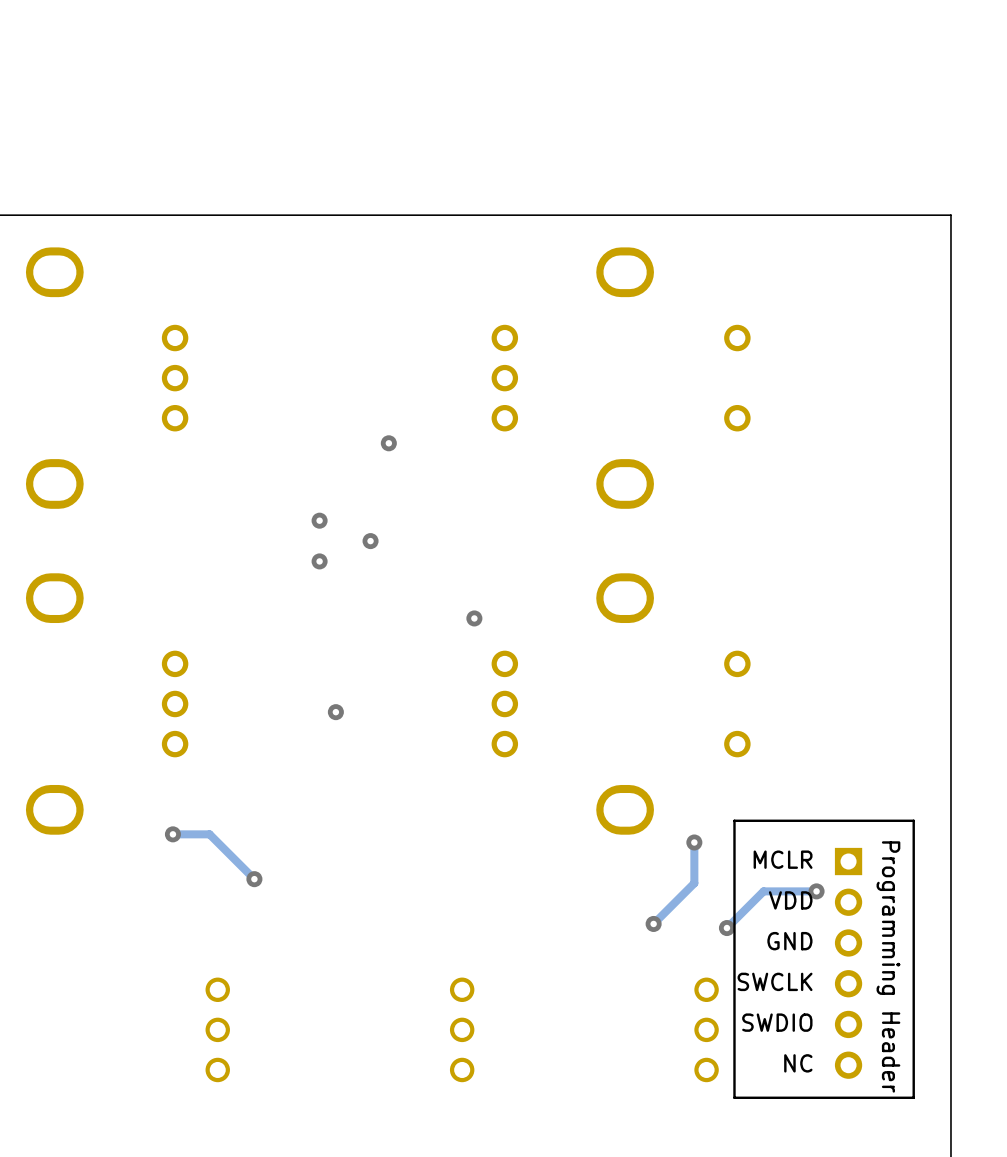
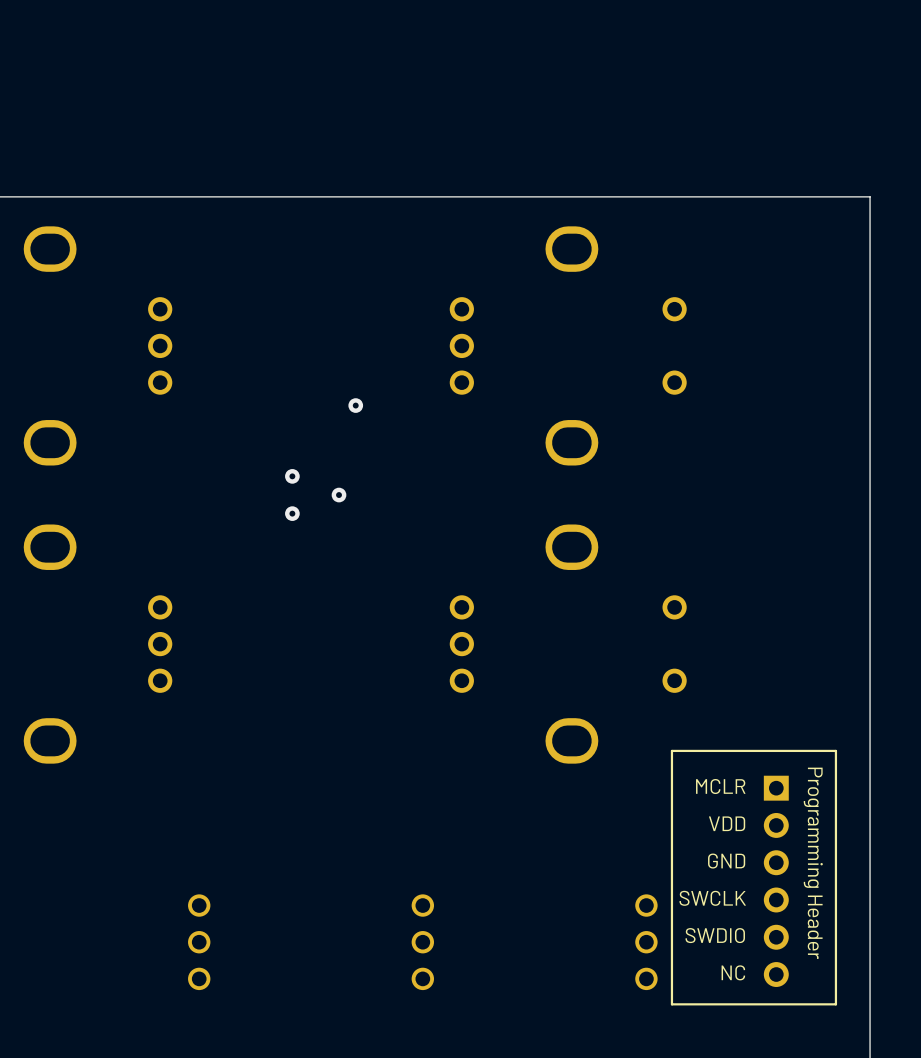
via: (474, 618) -> none
via: (335, 712) -> none
track: (172, 834) (209, 834) (254, 879) -> none
via: (172, 834) -> none
track: (694, 842) (694, 883) (653, 923) -> none
via: (694, 842) -> none
via: (254, 879) -> none
track: (816, 891) (763, 891) (726, 928) -> none
via: (816, 891) -> none
via: (653, 923) -> none
via: (726, 928) -> none

